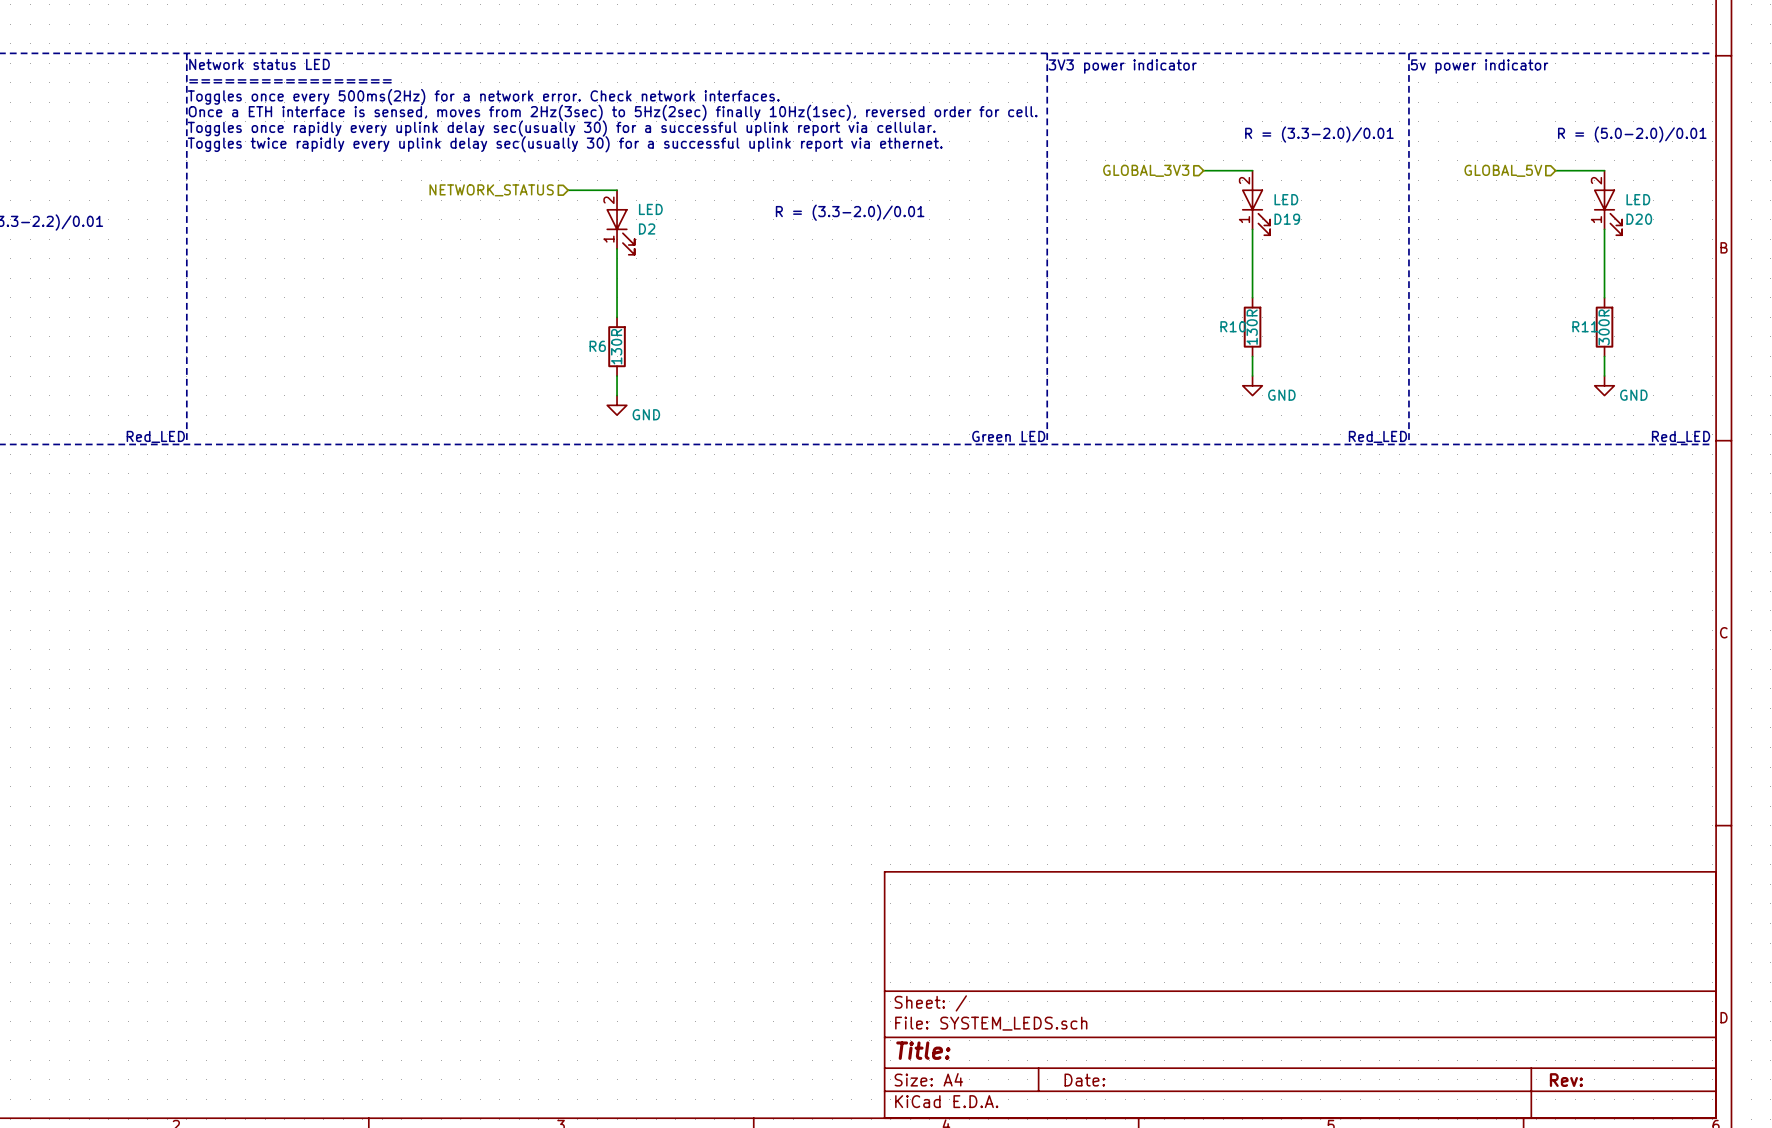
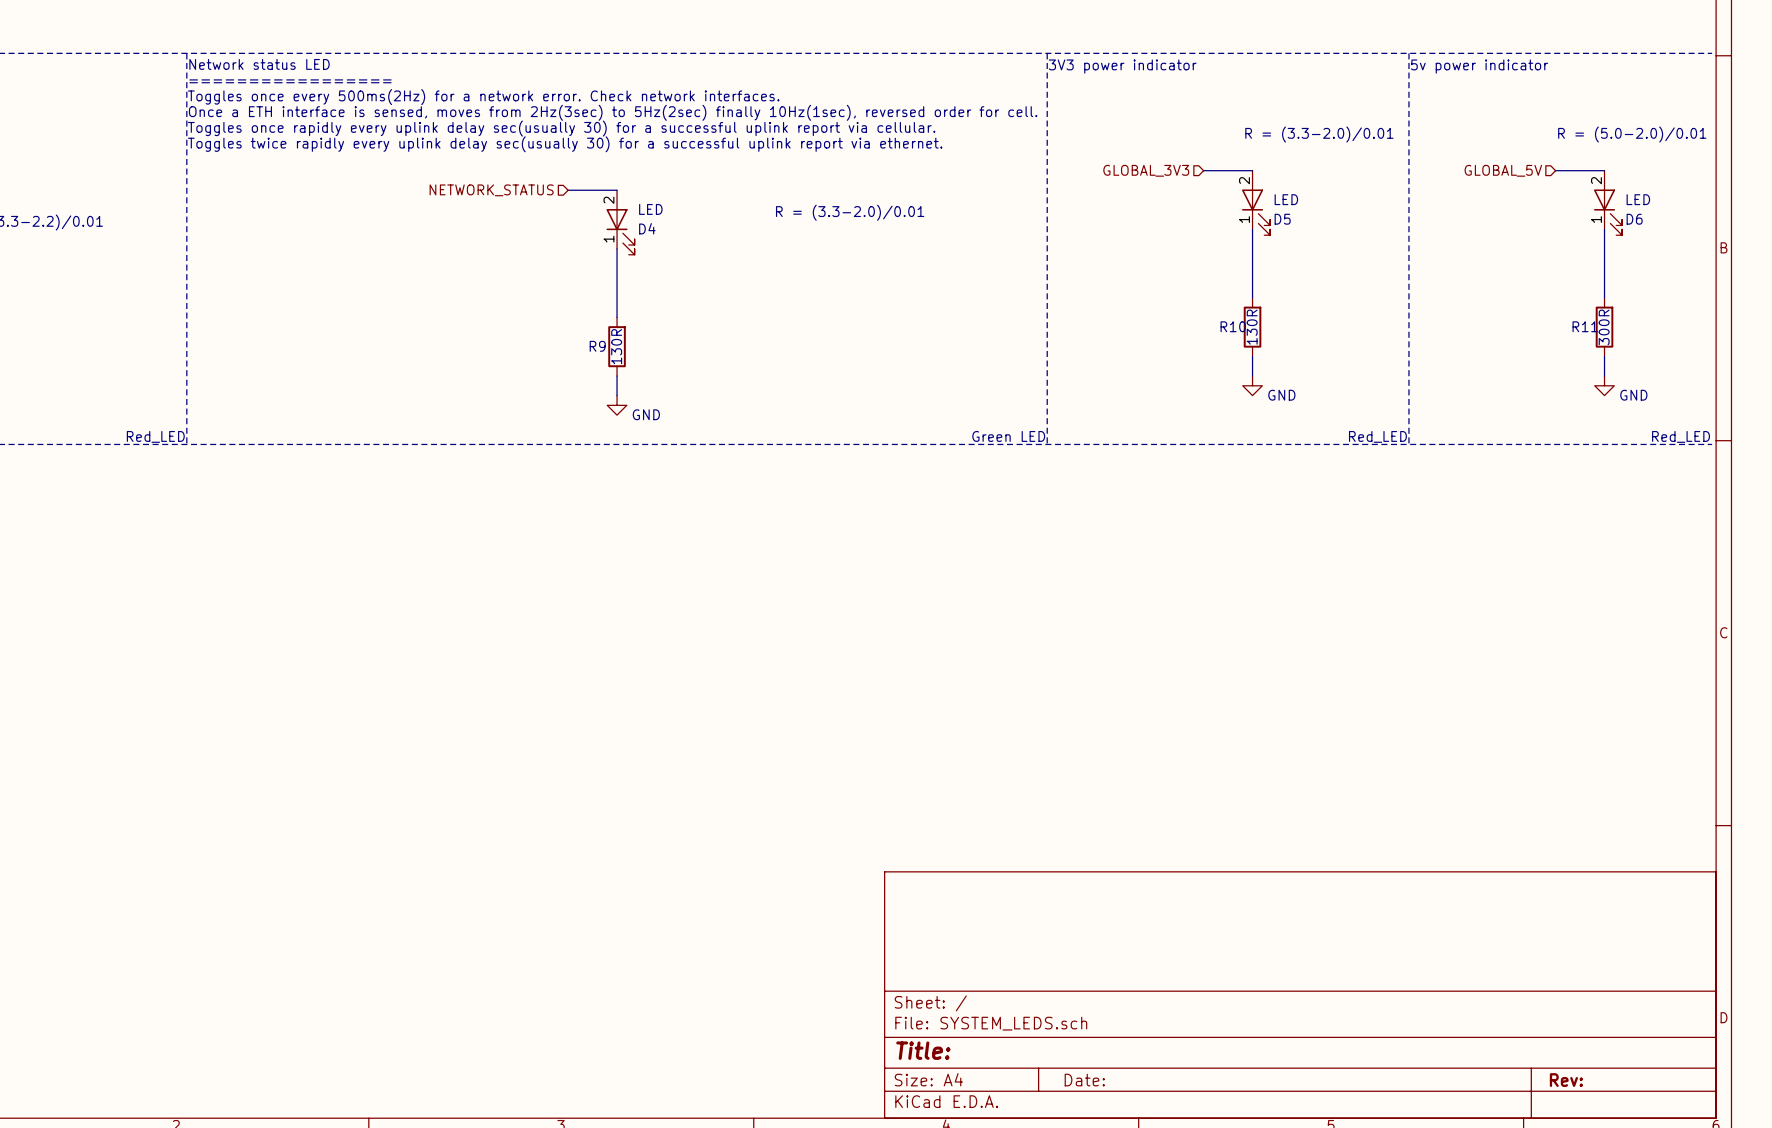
D19 name: D19 (1287, 219) -> D5 (1282, 219)
D20 name: D20 (1639, 219) -> D6 (1634, 219)
D2 name: D2 (647, 228) -> D4 (647, 228)
R6 name: R6 (597, 346) -> R9 (597, 346)

